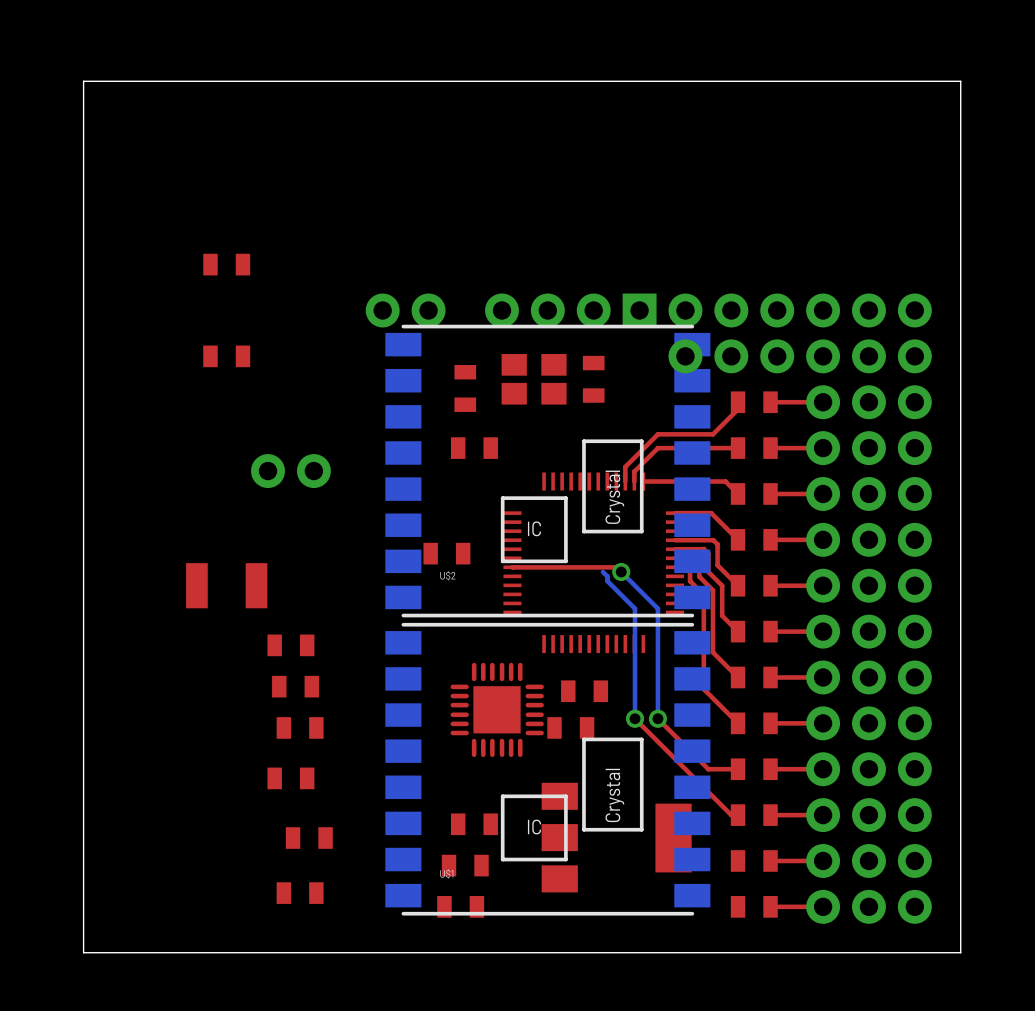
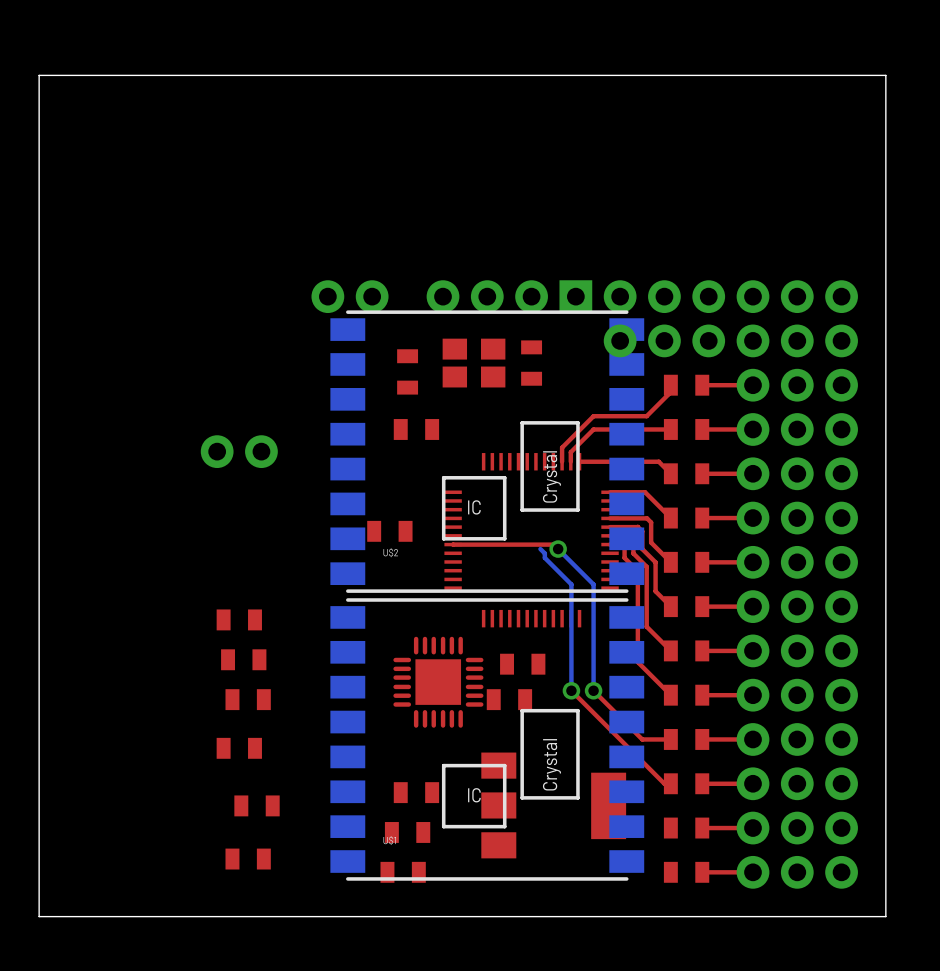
part: (226, 264) -> none
part: (226, 356) -> none
part: (226, 585) -> none

